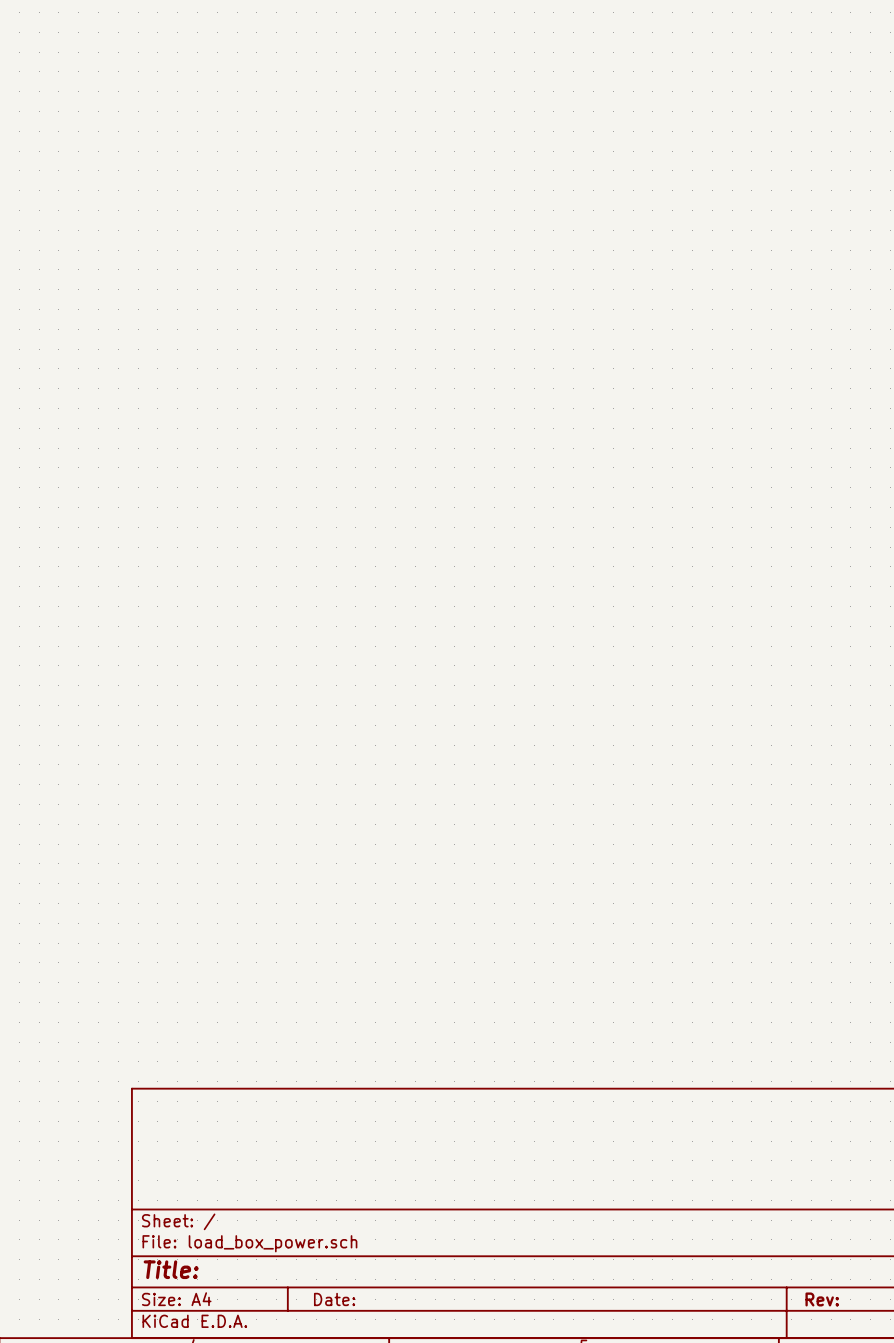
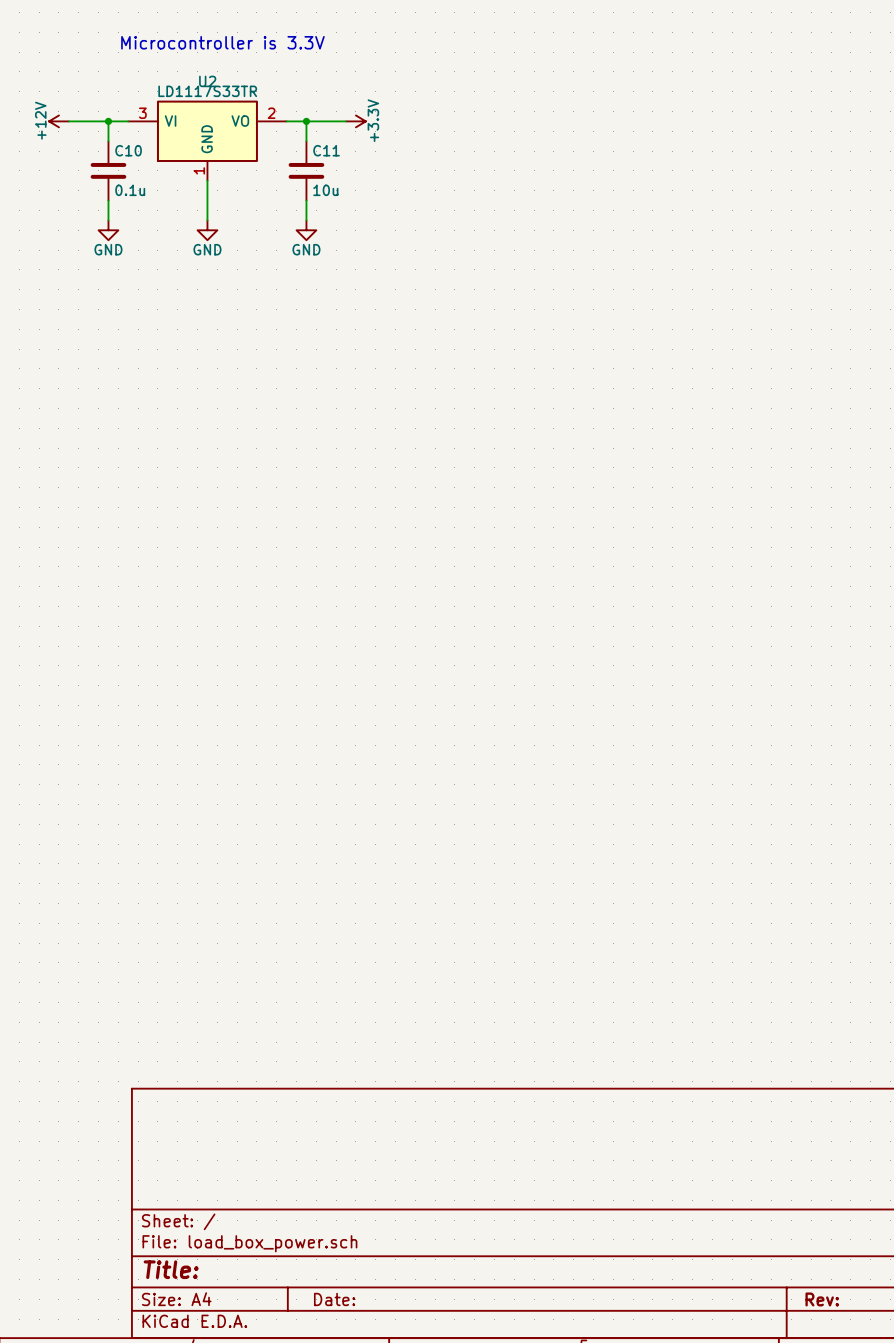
text: none -> Microcontroller is 3.3V (222, 42)
power symbol: none -> +12V (58, 121)
wire: none -> (68, 121) (128, 121)
wire: none -> (108, 121) (108, 141)
junction: none -> (108, 121)
wire: none -> (286, 121) (346, 121)
wire: none -> (306, 121) (306, 141)
junction: none -> (306, 121)
power symbol: none -> +3.3V (355, 121)
U2: none -> LD1117S33TR (207, 140)
C10: none -> 0.1u (108, 170)
C11: none -> 10u (306, 170)
wire: none -> (207, 180) (207, 220)
wire: none -> (108, 200) (108, 220)
wire: none -> (306, 200) (306, 220)
power symbol: none -> GND (108, 230)
power symbol: none -> GND (207, 230)
power symbol: none -> GND (306, 230)

